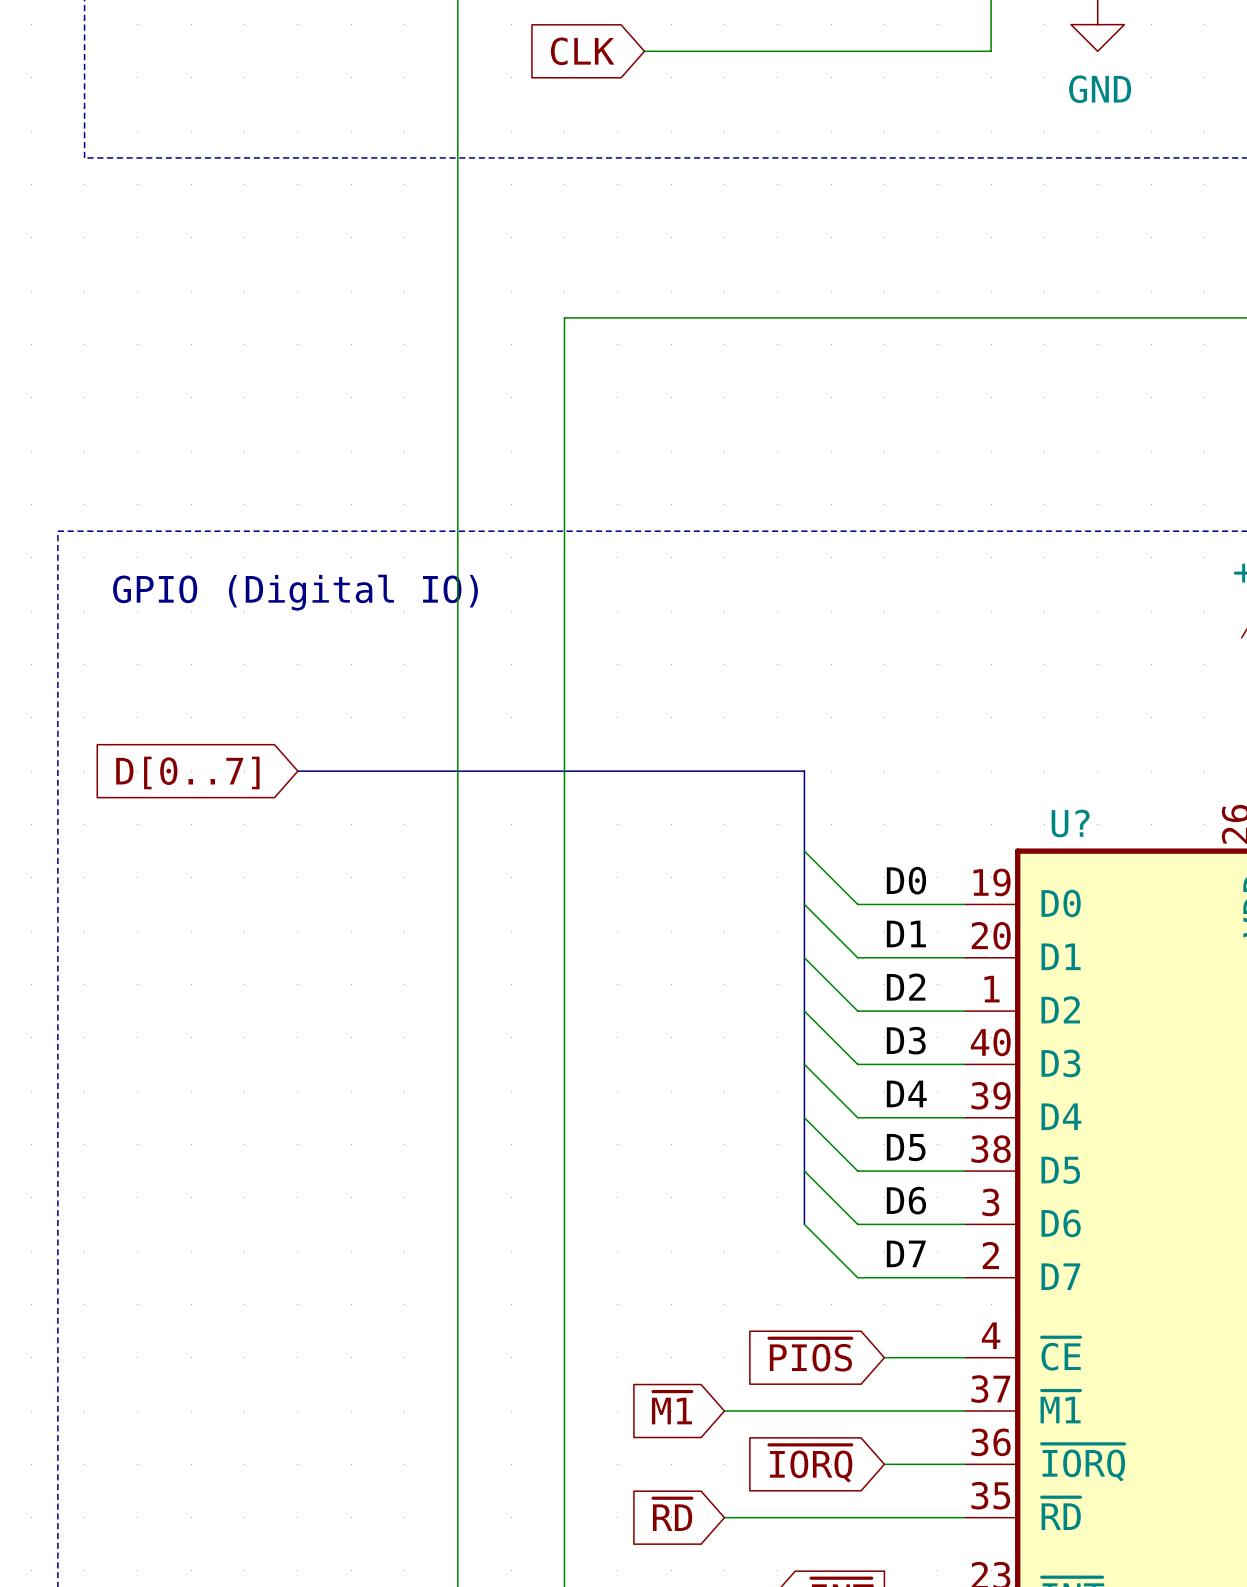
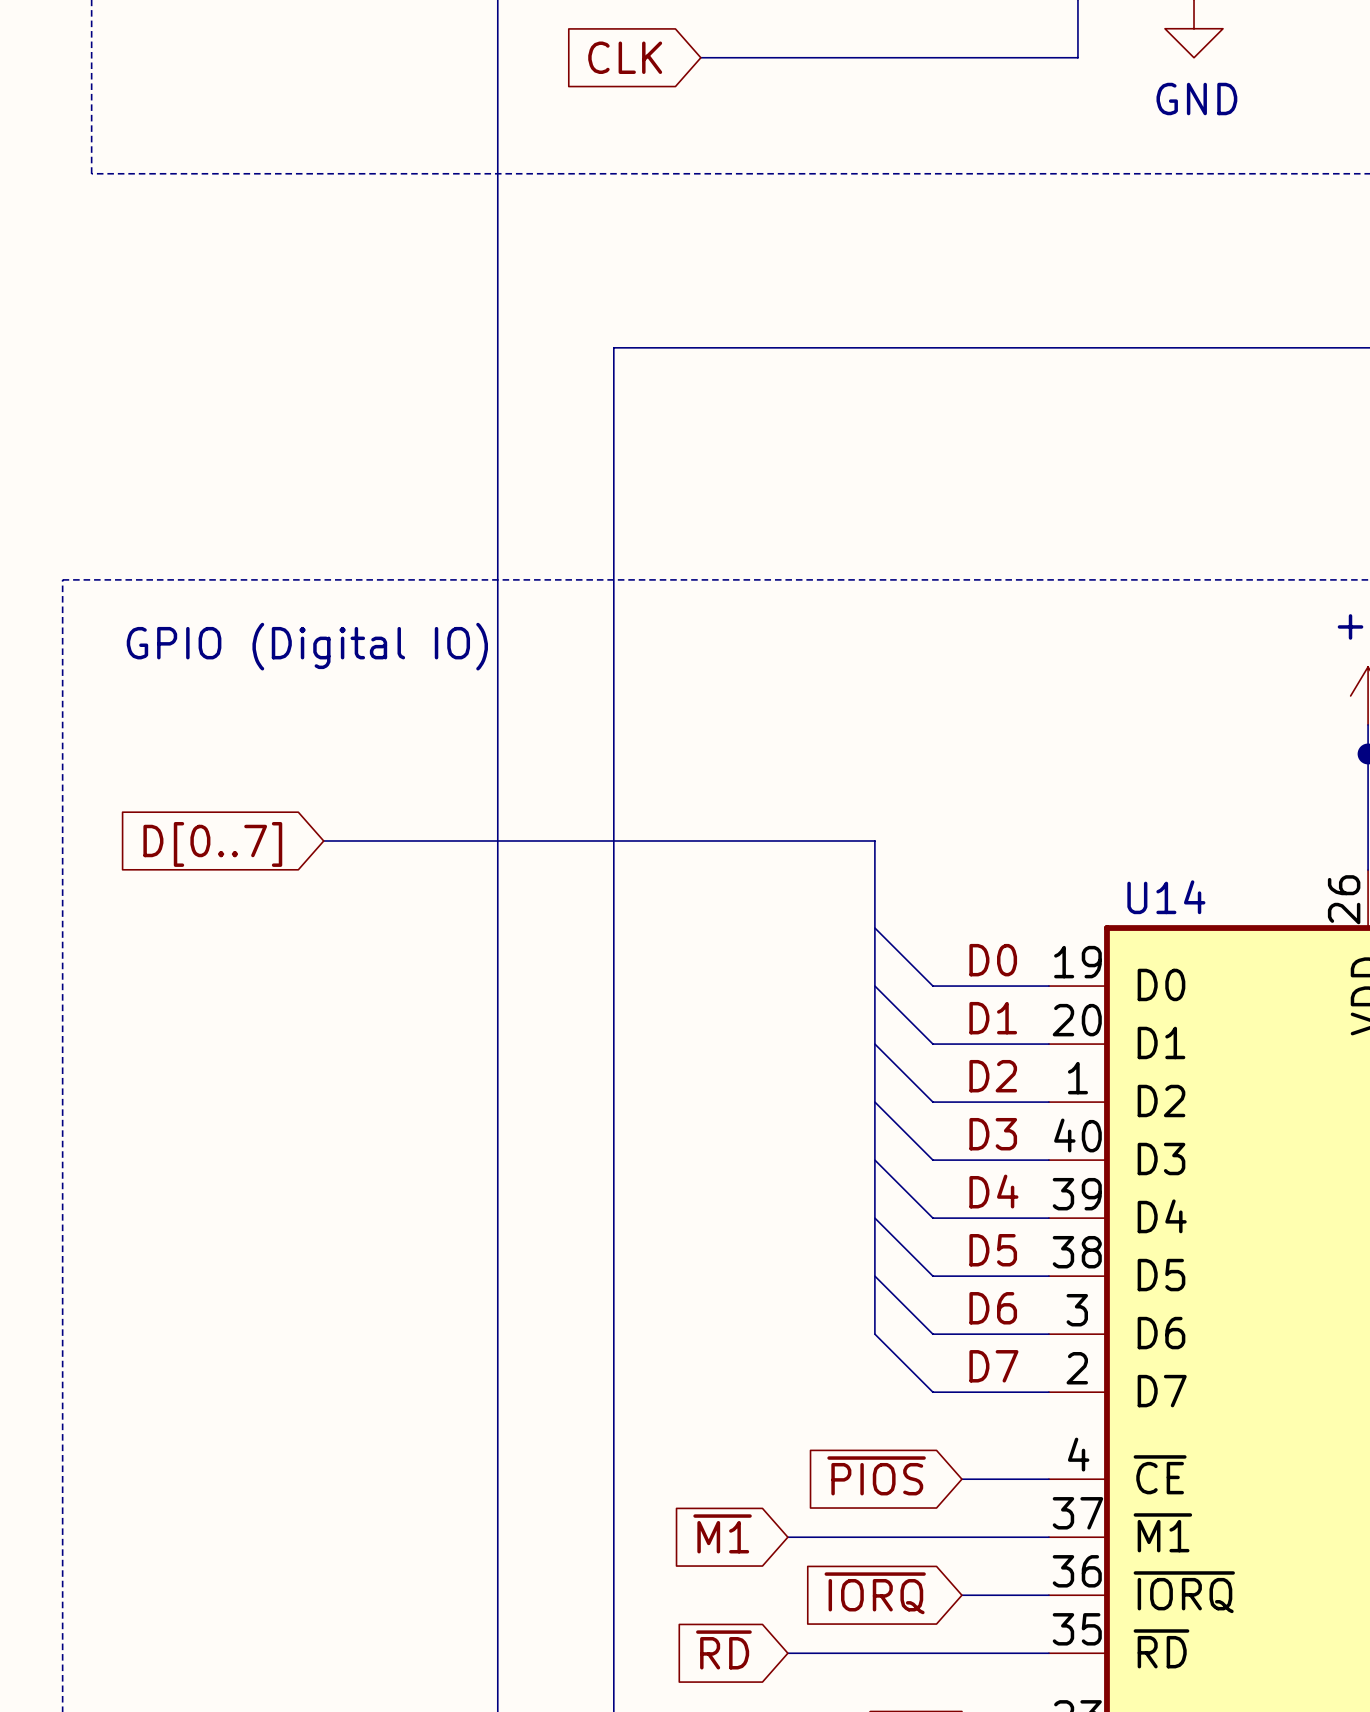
U? name: U? (1070, 823) -> U14 (1166, 897)

